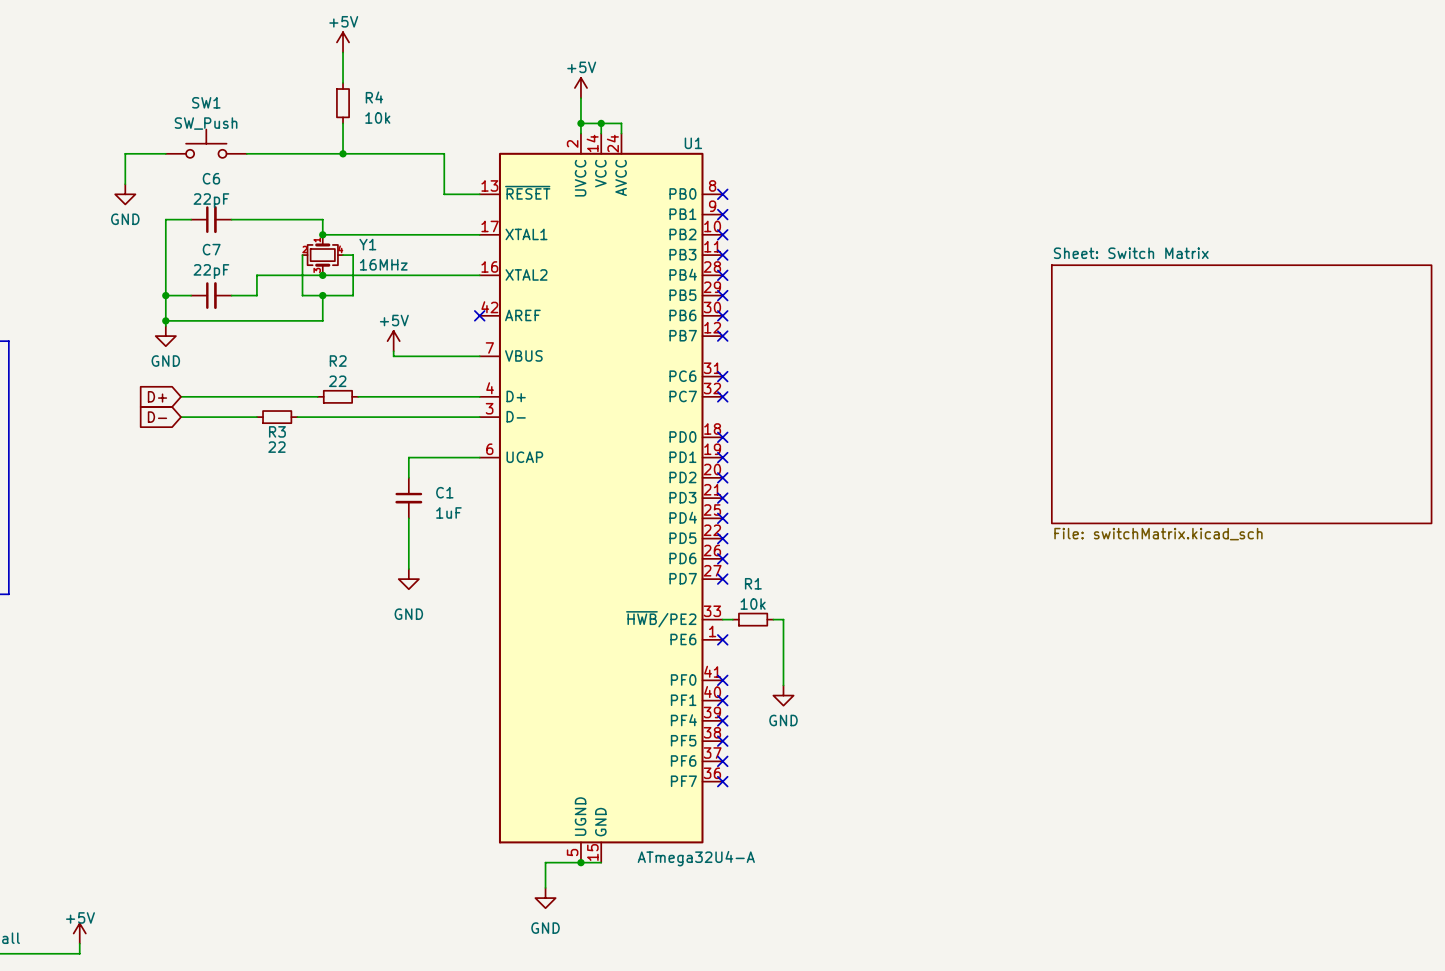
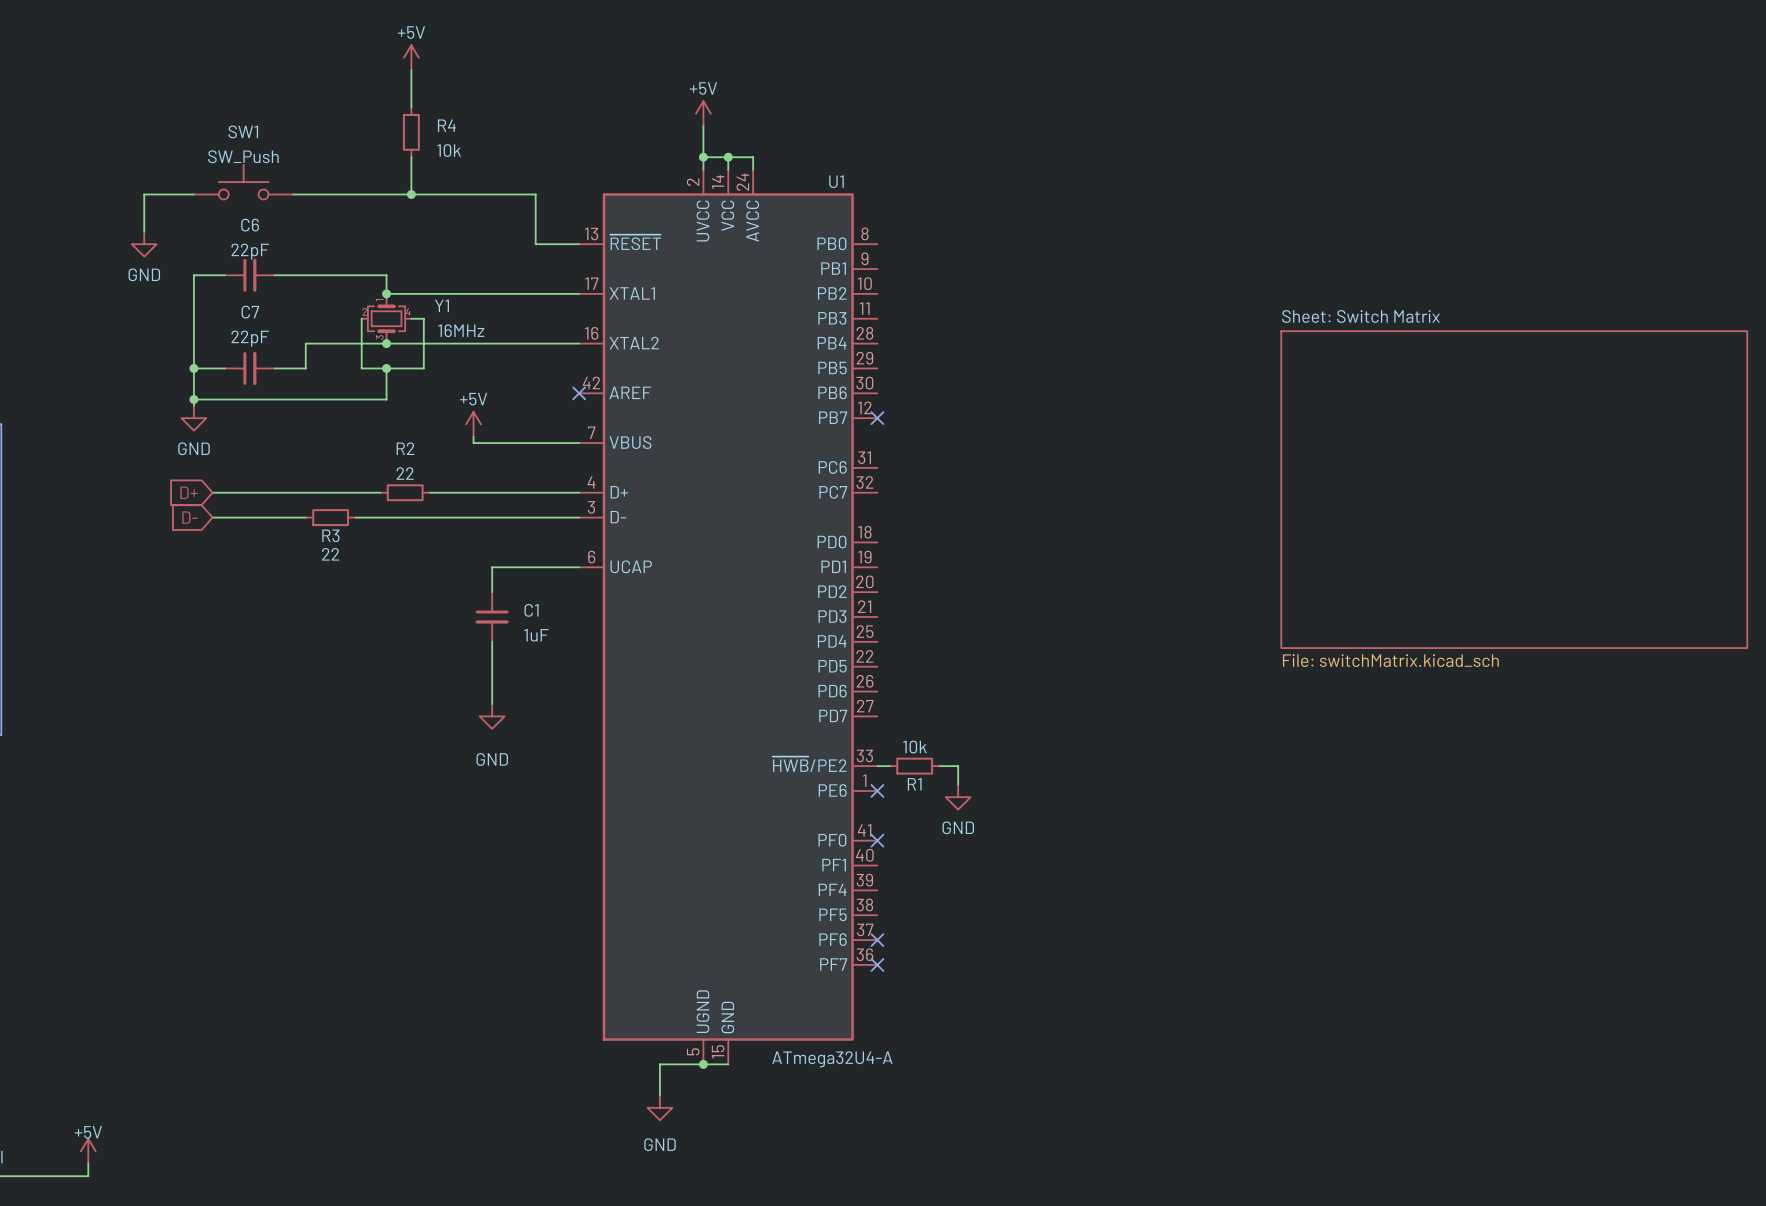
no-connect mark: (722, 194) -> none
no-connect mark: (722, 214) -> none
no-connect mark: (722, 234) -> none
no-connect mark: (722, 255) -> none
no-connect mark: (722, 275) -> none
no-connect mark: (722, 295) -> none
no-connect mark: (722, 315) -> none
no-connect mark: (722, 376) -> none
no-connect mark: (722, 396) -> none
no-connect mark: (722, 437) -> none
no-connect mark: (722, 457) -> none
no-connect mark: (722, 477) -> none
no-connect mark: (722, 498) -> none
no-connect mark: (722, 518) -> none
no-connect mark: (722, 538) -> none
no-connect mark: (722, 558) -> none
no-connect mark: (722, 579) -> none
R1 name position: R1 (753, 583) -> R1 (914, 784)
wire: (783, 619) (783, 685) -> (951, 766) (958, 766) (958, 784)
power symbol position: GND (783, 695) -> GND (958, 797)
no-connect mark: (722, 700) -> none
no-connect mark: (722, 720) -> none
no-connect mark: (722, 741) -> none

